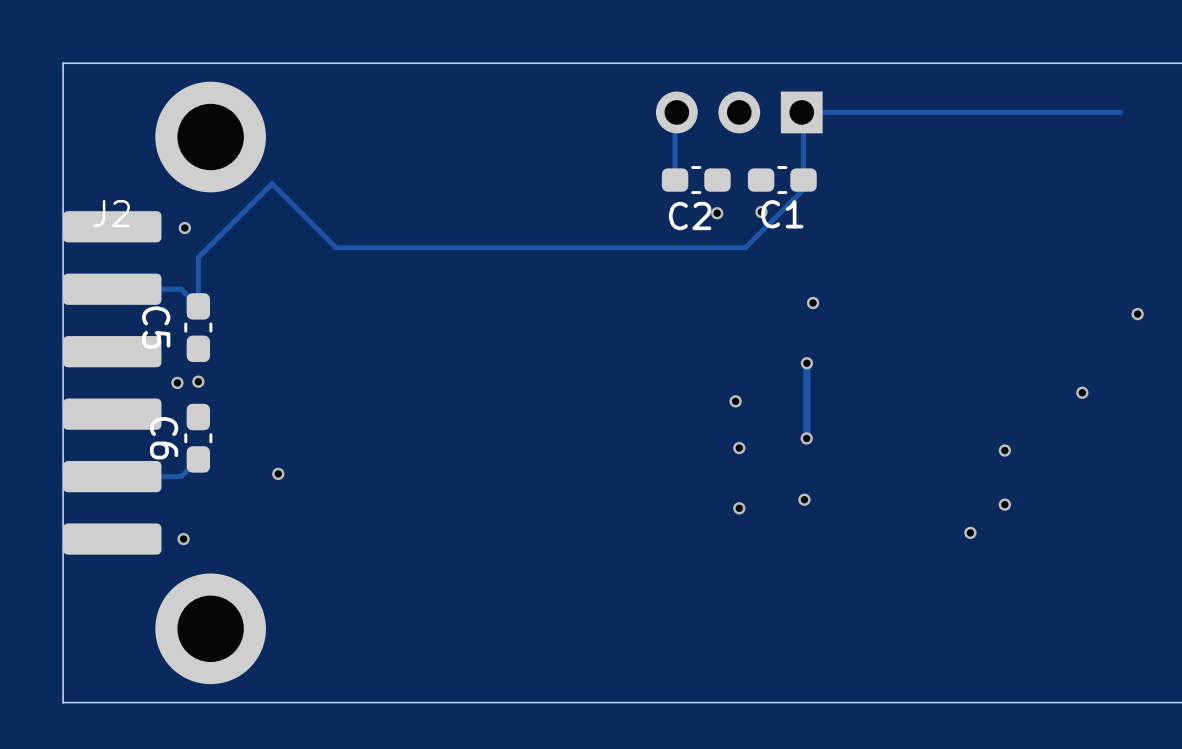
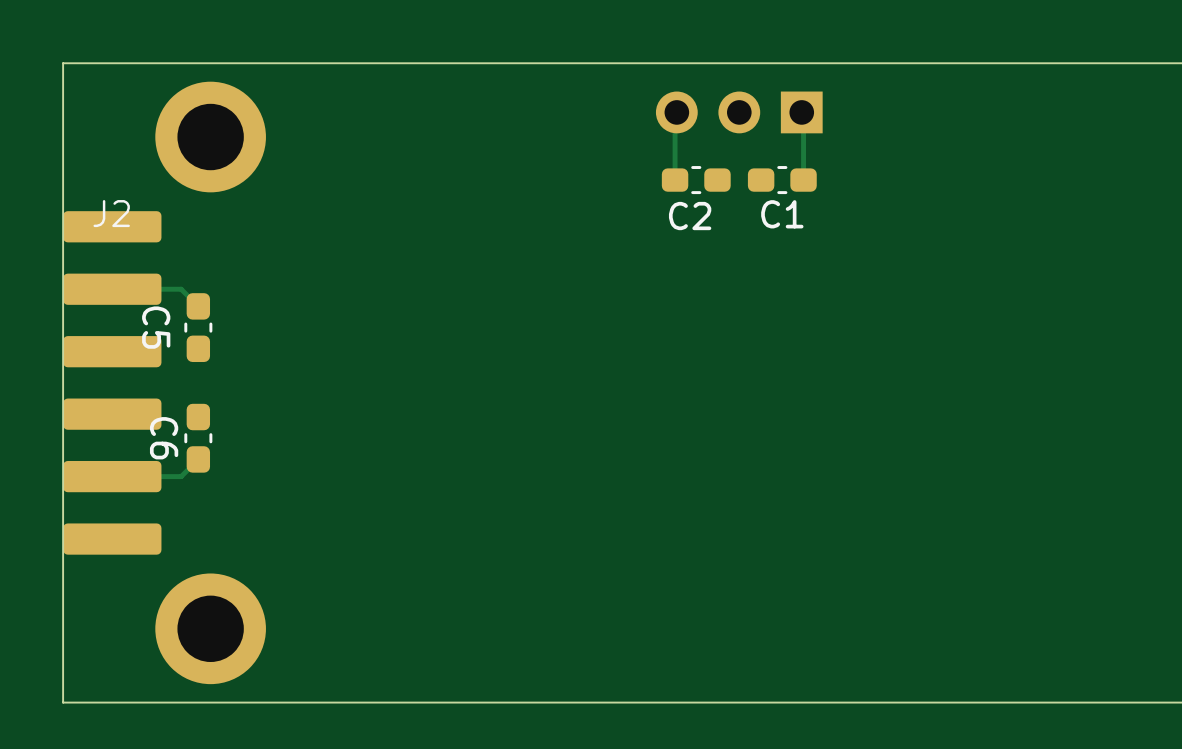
track: (1120, 112) (801, 112) -> none
track: (803, 180) (803, 189) (745, 247) (336, 247) (272, 183) (198, 257) (198, 306) -> none
via: (761, 212) -> none
via: (717, 213) -> none
via: (184, 228) -> none
via: (813, 303) -> none
via: (1137, 314) -> none
track: (806, 363) (806, 438) -> none
via: (806, 363) -> none
via: (198, 381) -> none
via: (177, 382) -> none
via: (1082, 392) -> none
via: (735, 401) -> none
via: (806, 438) -> none
via: (739, 448) -> none
via: (1004, 450) -> none
via: (278, 473) -> none
via: (804, 499) -> none
via: (1004, 504) -> none
via: (739, 508) -> none
via: (970, 532) -> none
via: (183, 539) -> none

